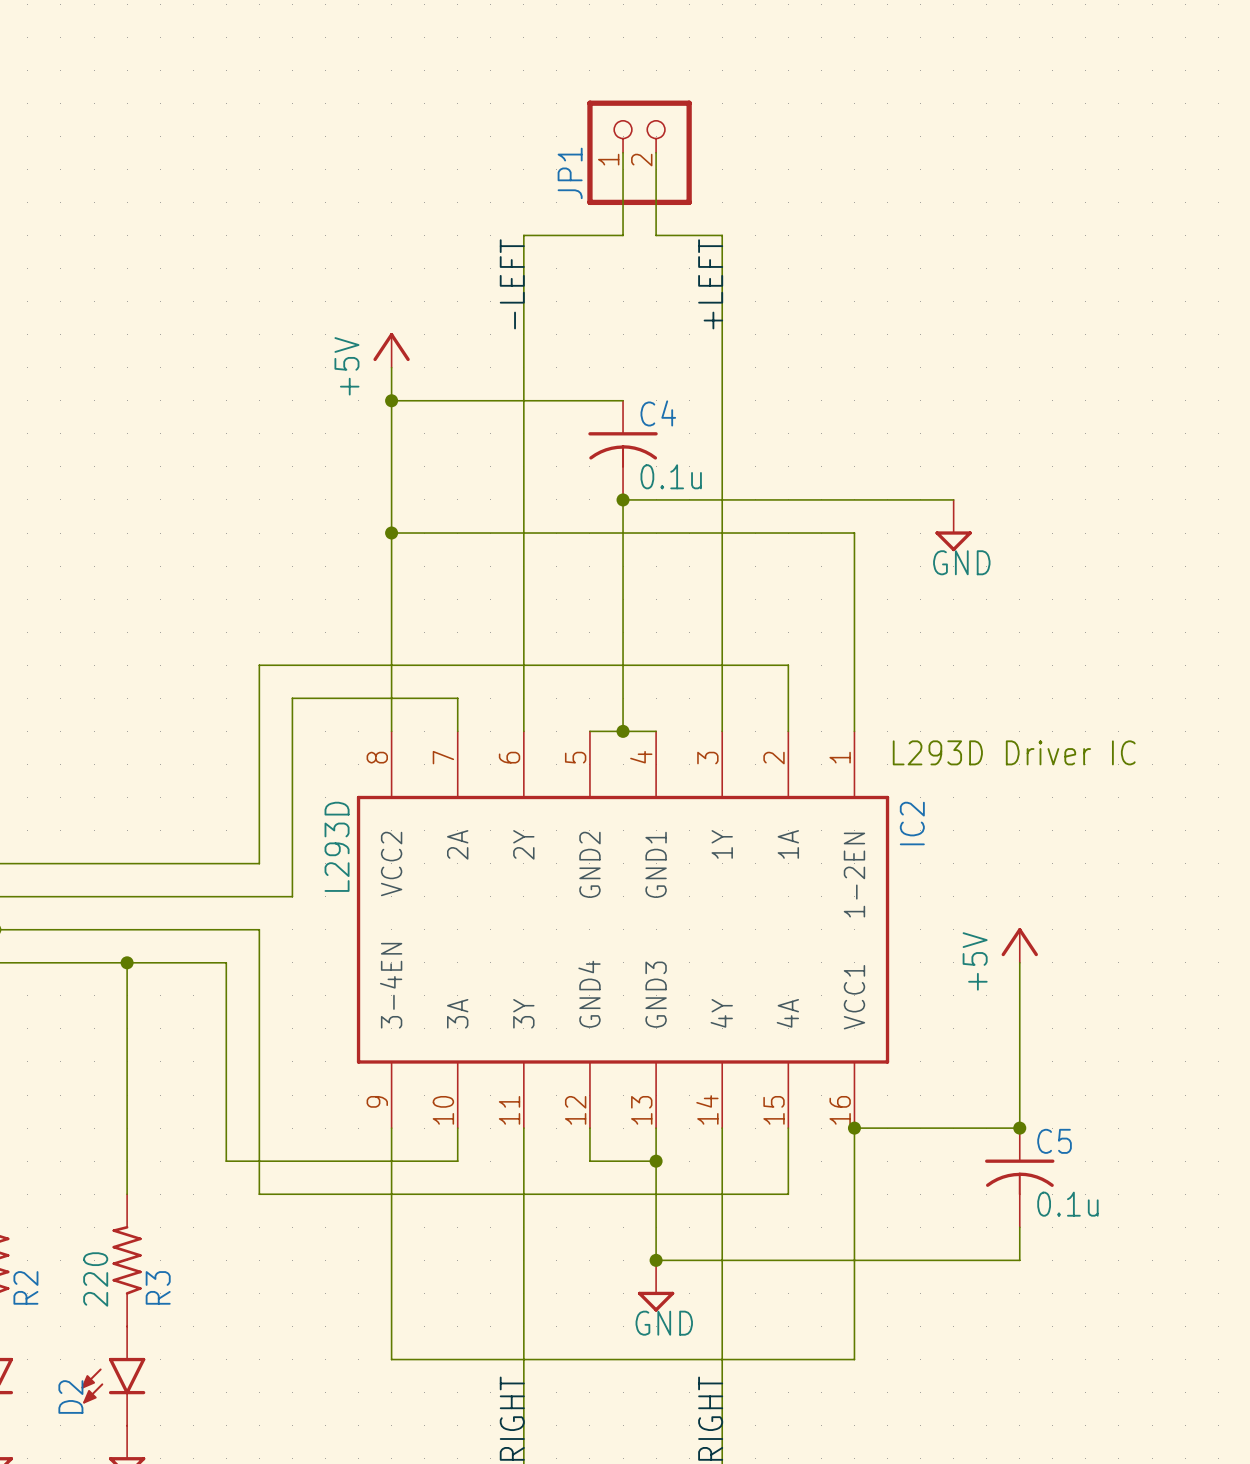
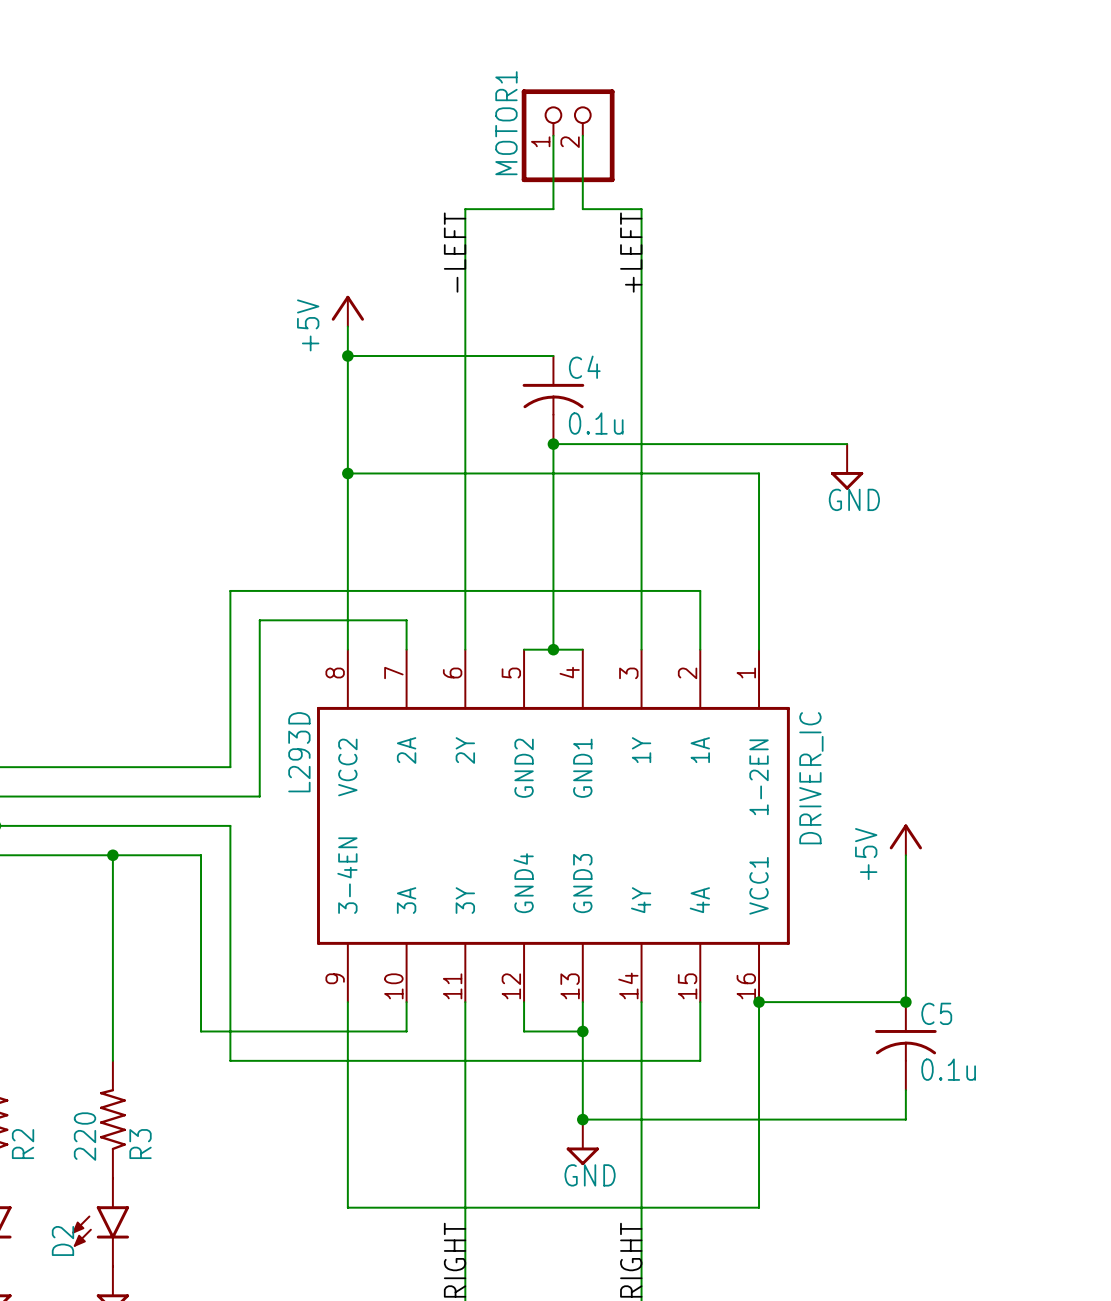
JP1 name: JP1 (570, 173) -> MOTOR1 (506, 123)
text: L293D Driver IC (1014, 752) -> none
IC2 name: IC2 (912, 823) -> DRIVER_IC (811, 778)

